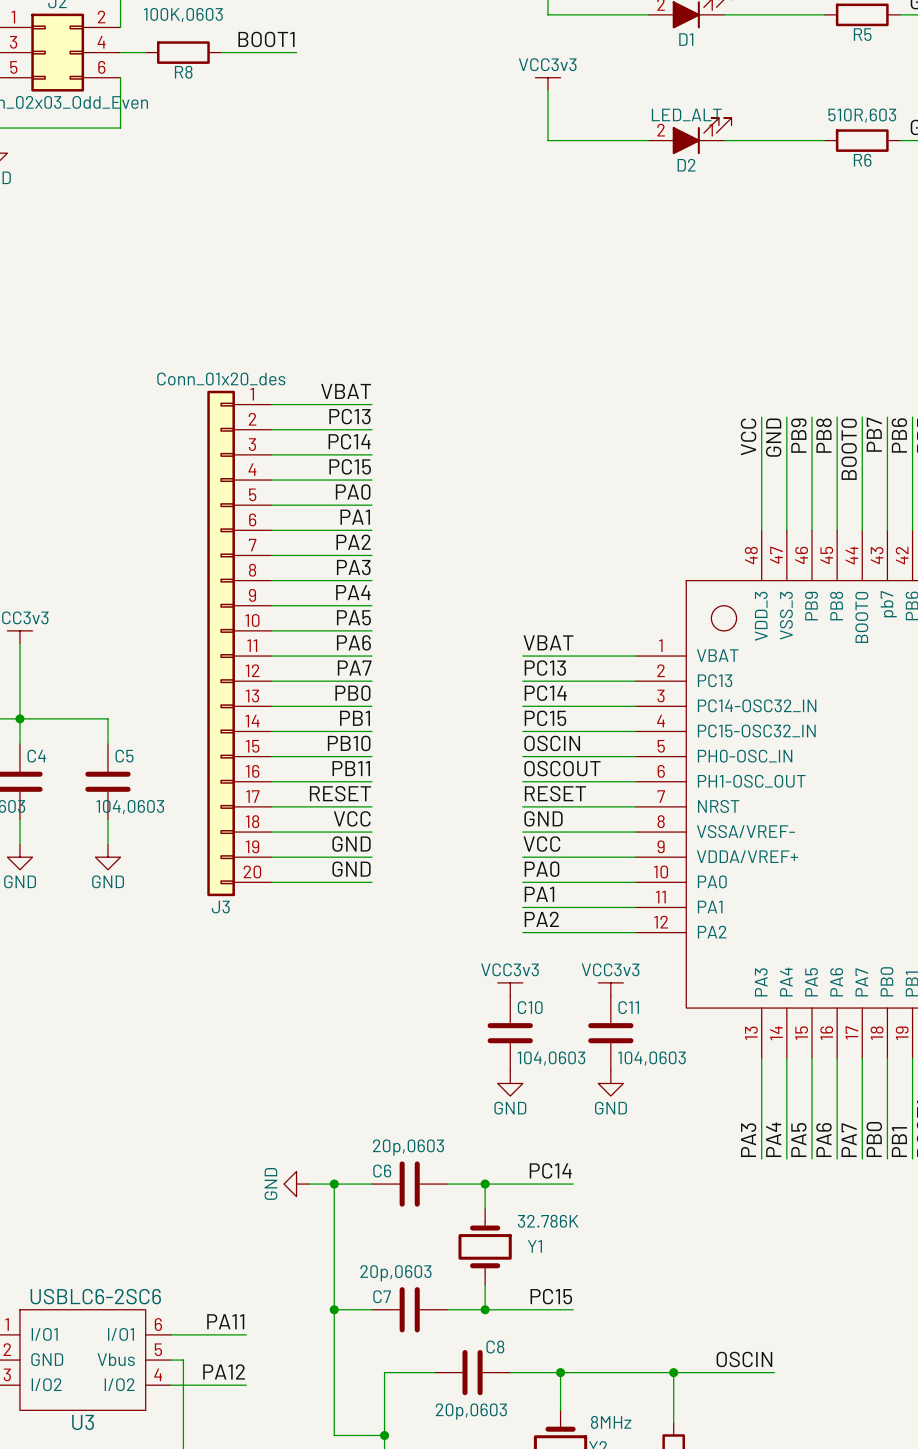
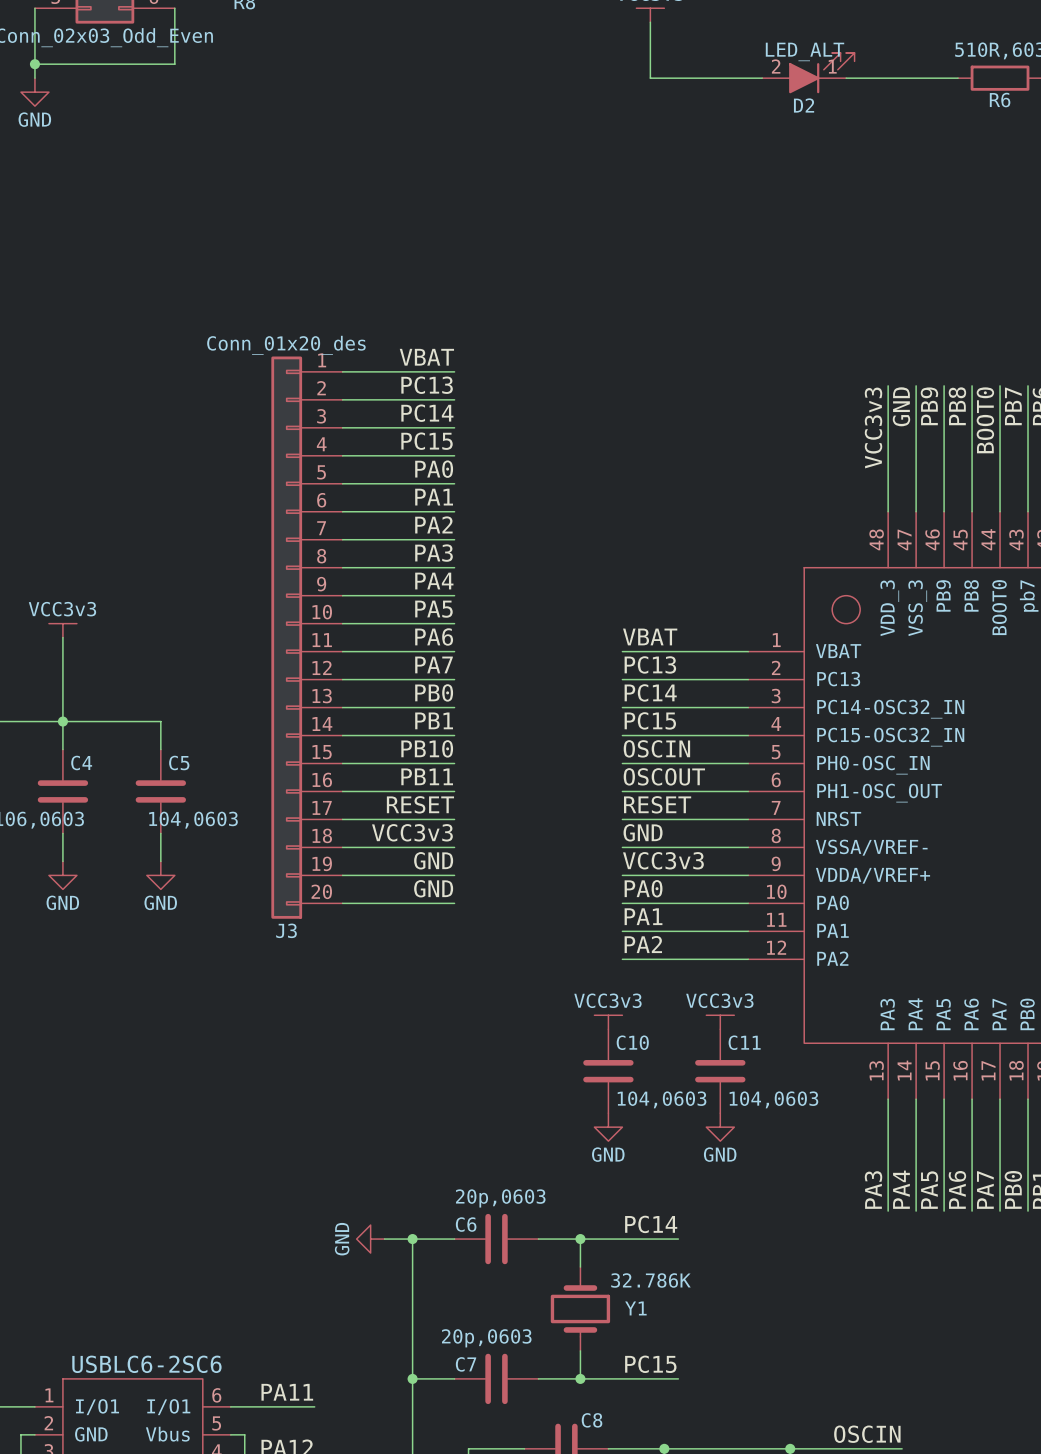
label: VCC (748, 436) -> VCC3v3 (873, 428)
label: VCC (352, 818) -> VCC3v3 (412, 832)
label: VCC (541, 844) -> VCC3v3 (663, 860)

